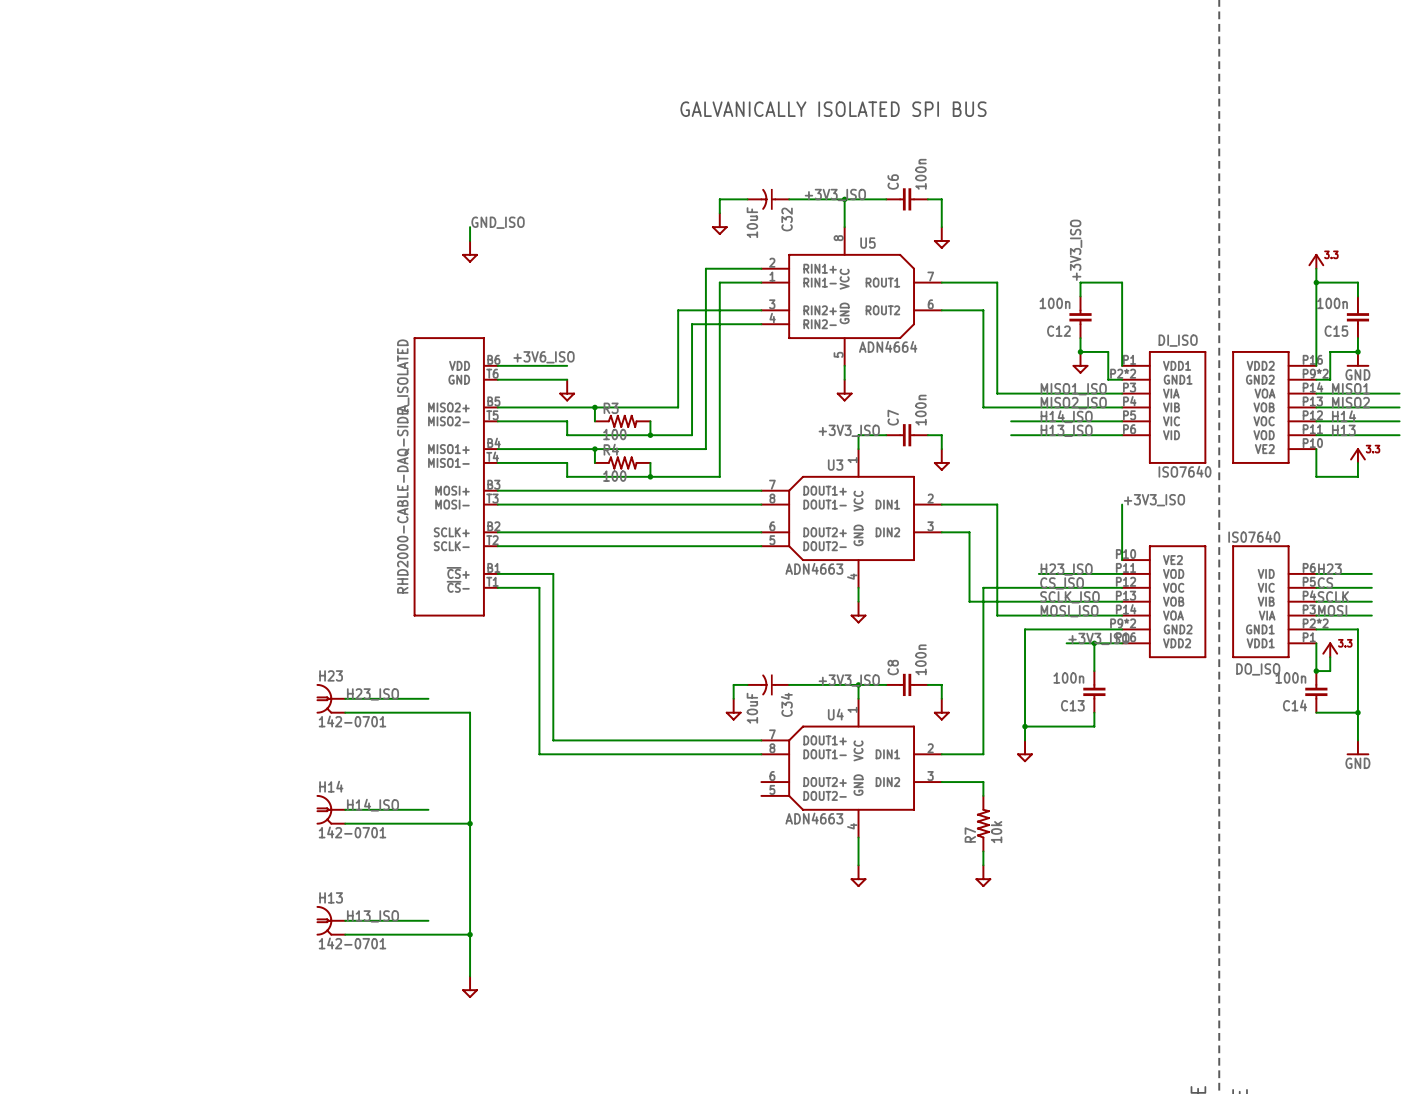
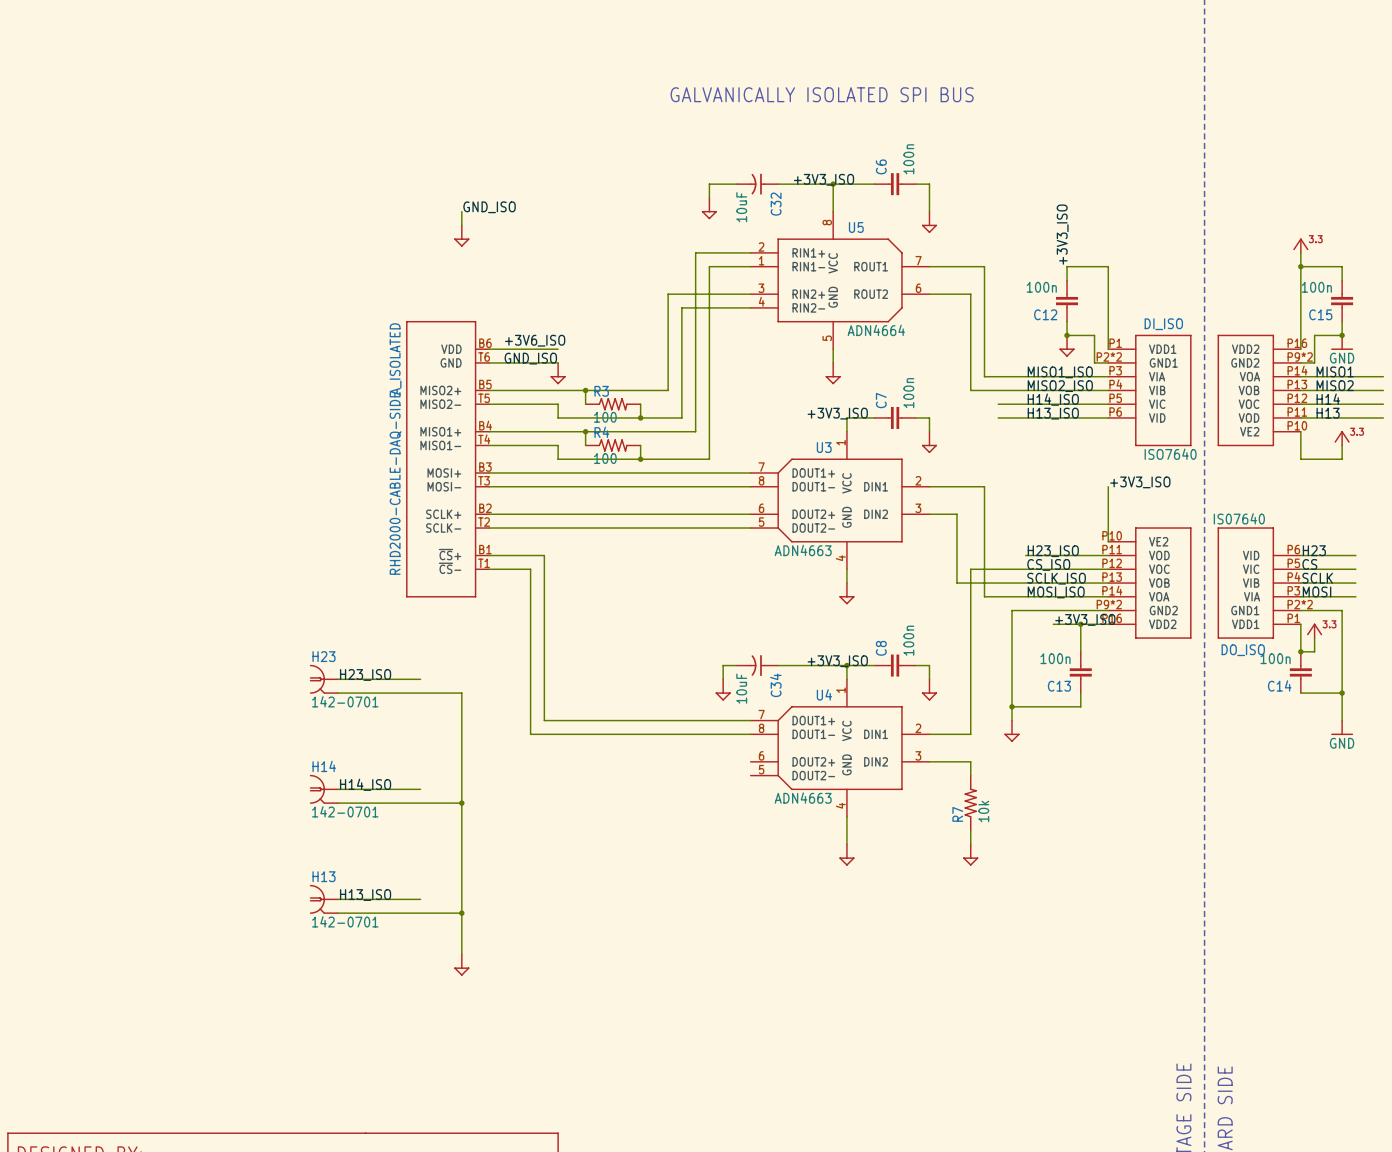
label: none -> GND_ISO (530, 358)

